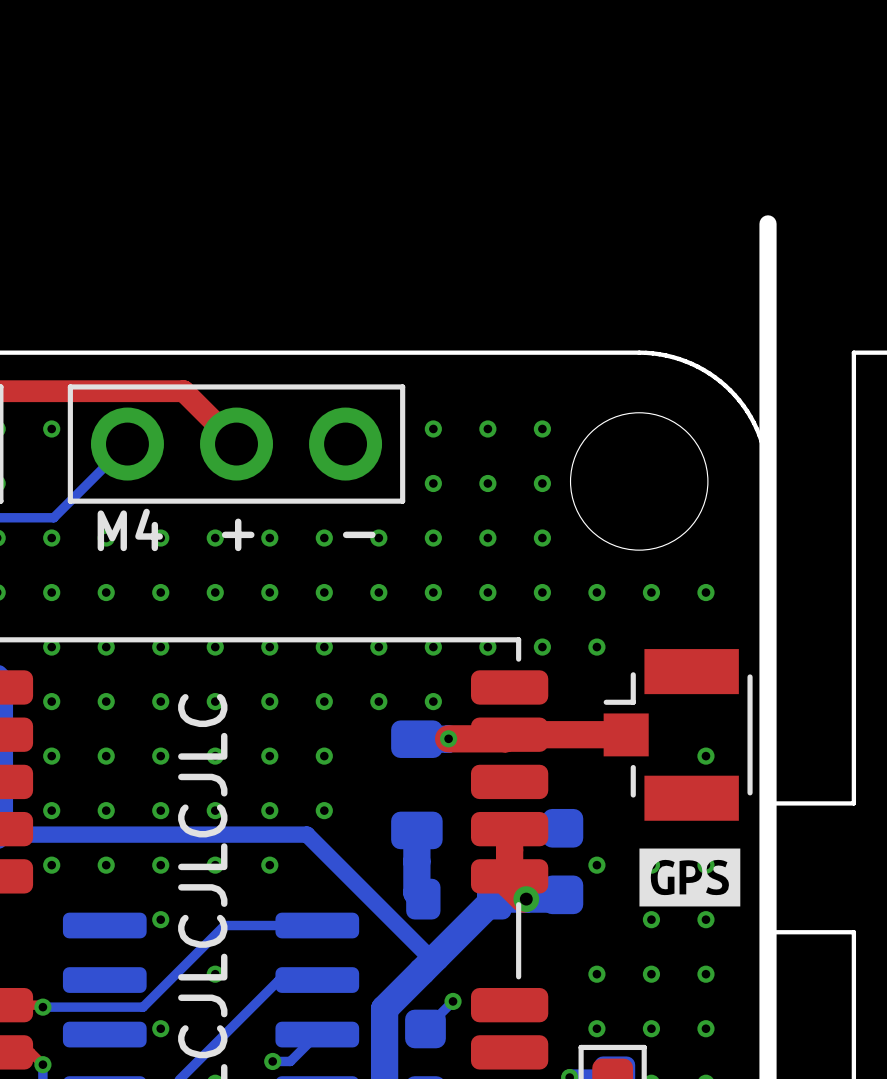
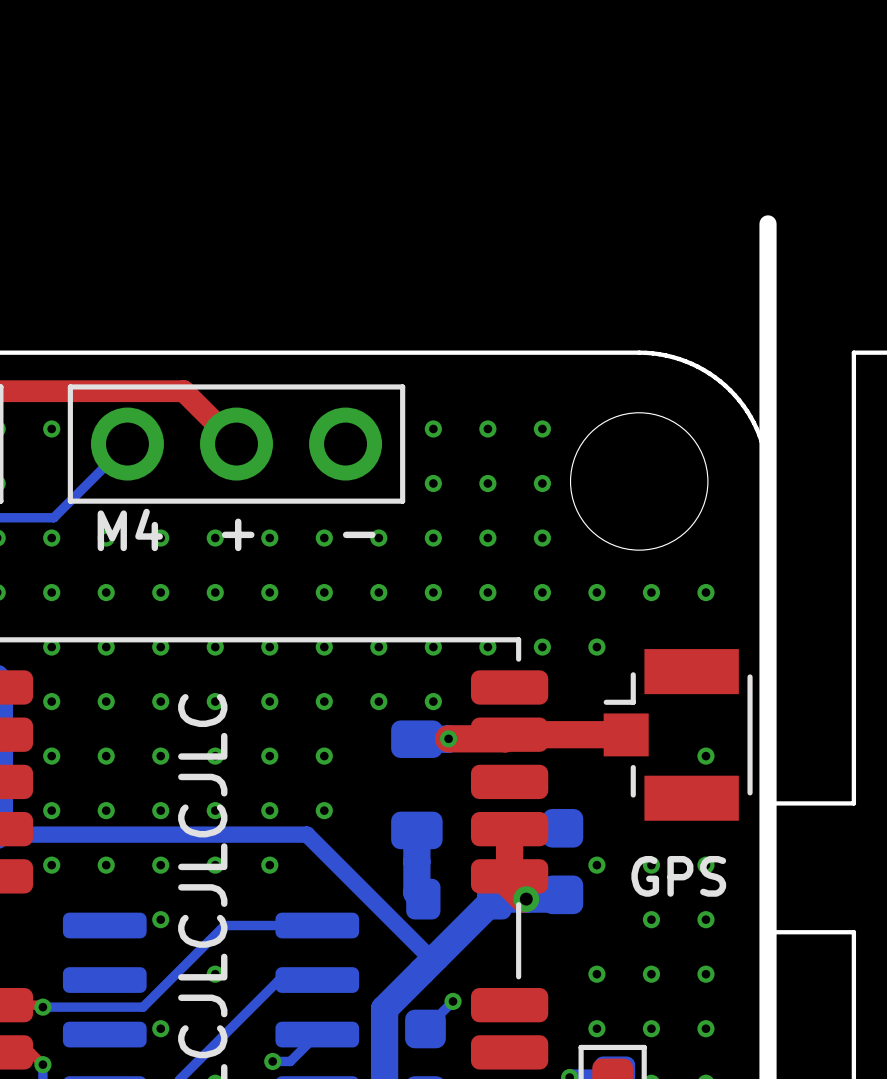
drawing: [639, 848, 741, 907] -> none
text: none -> GPS (678, 876)

